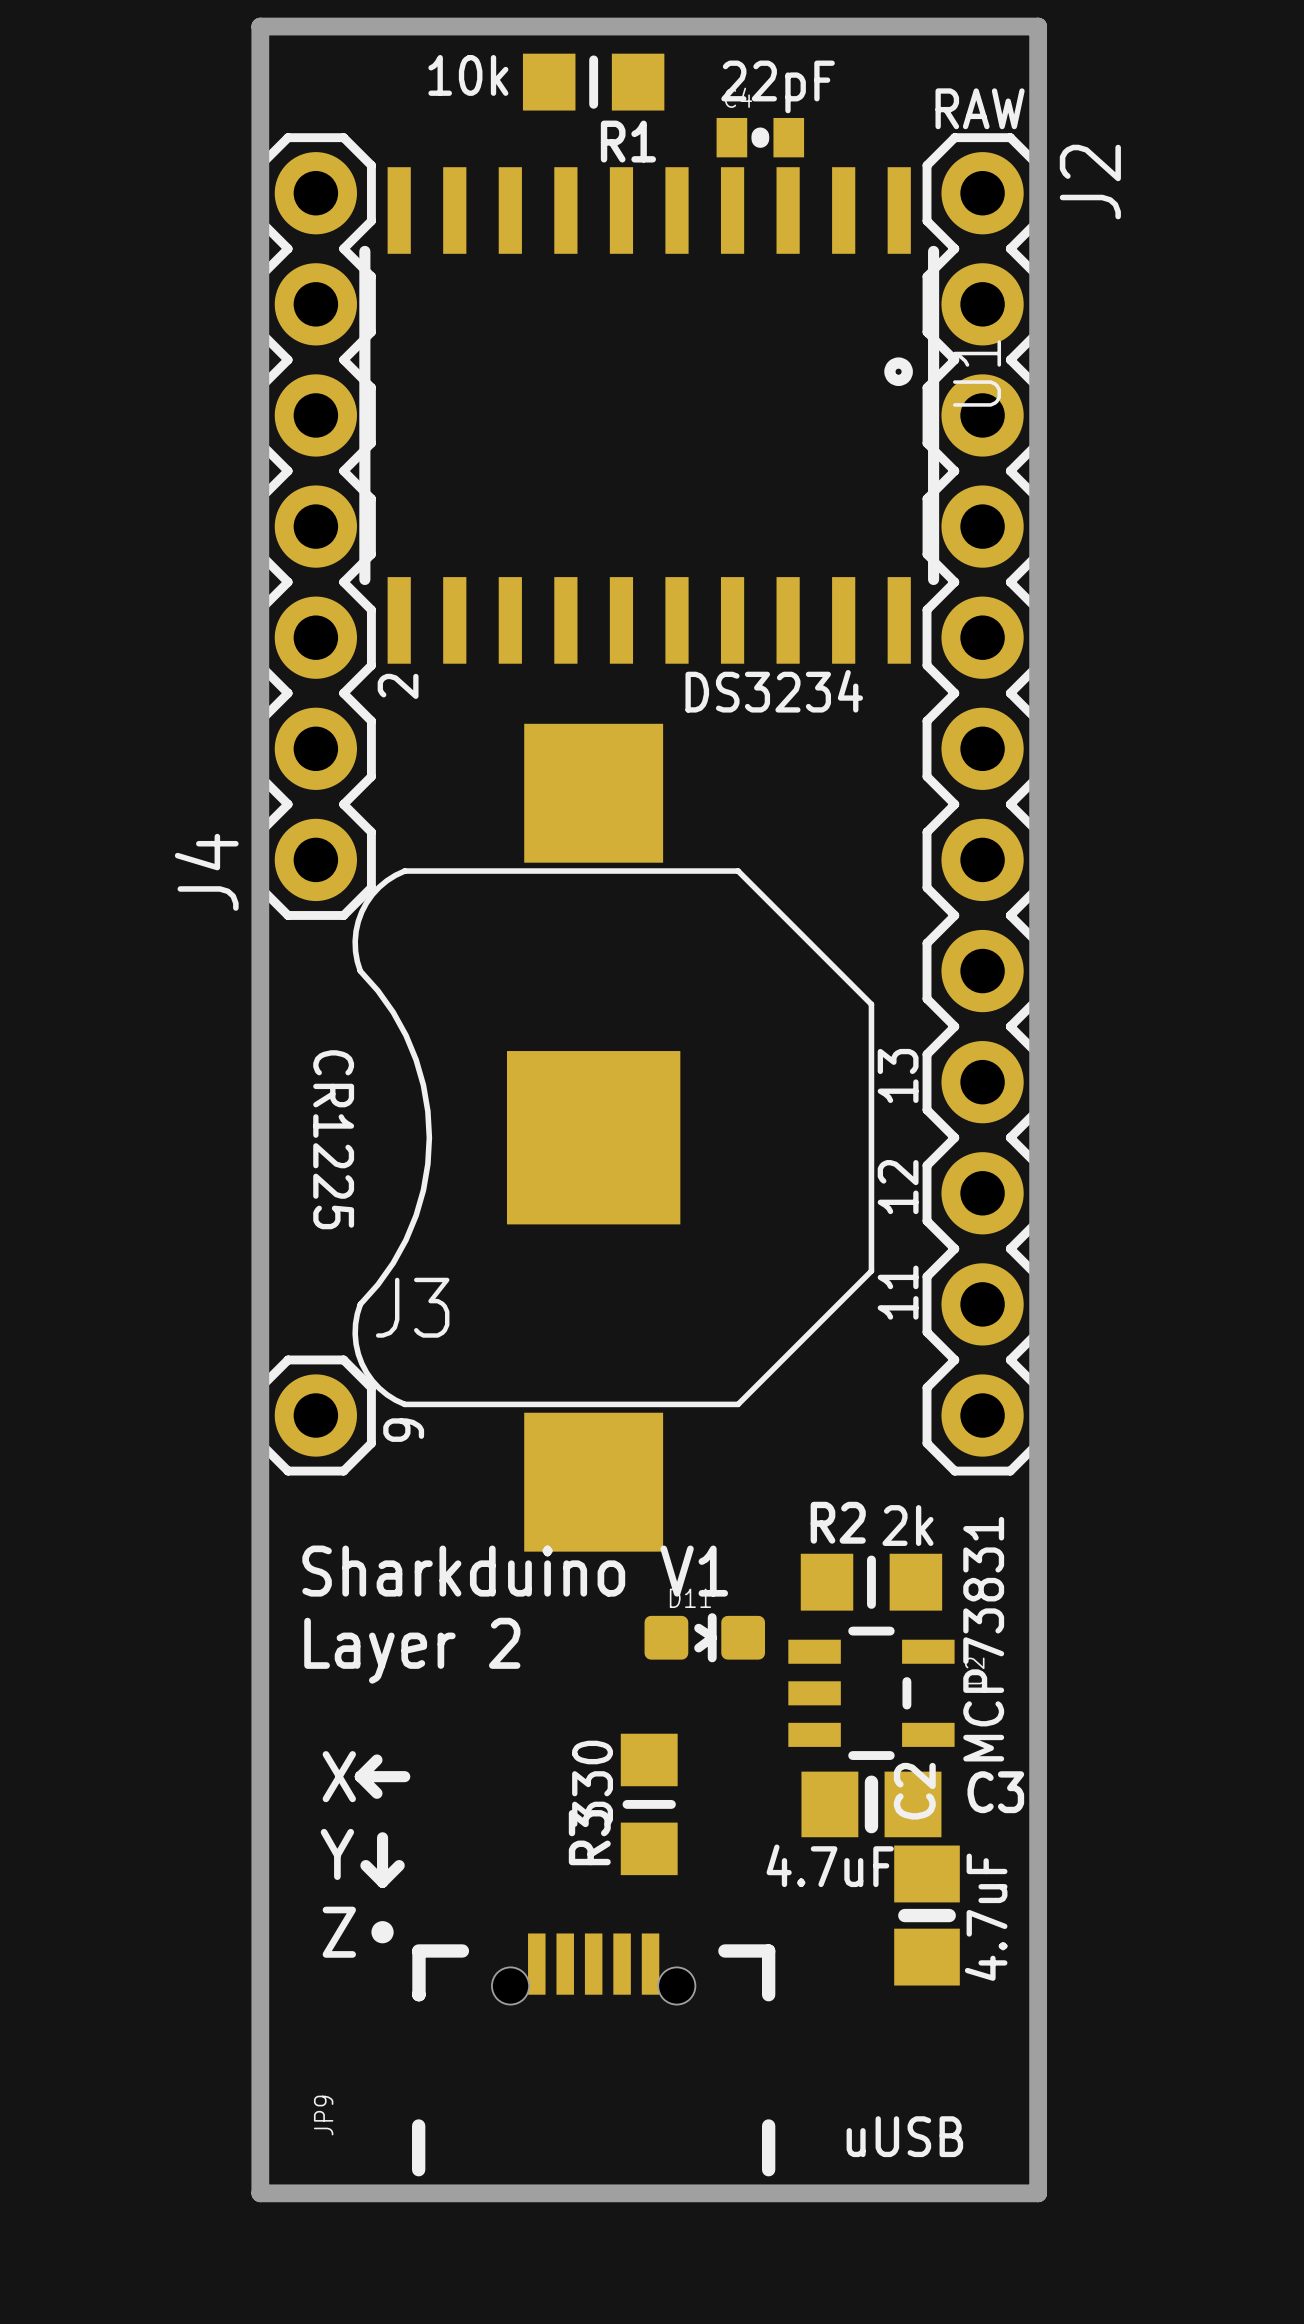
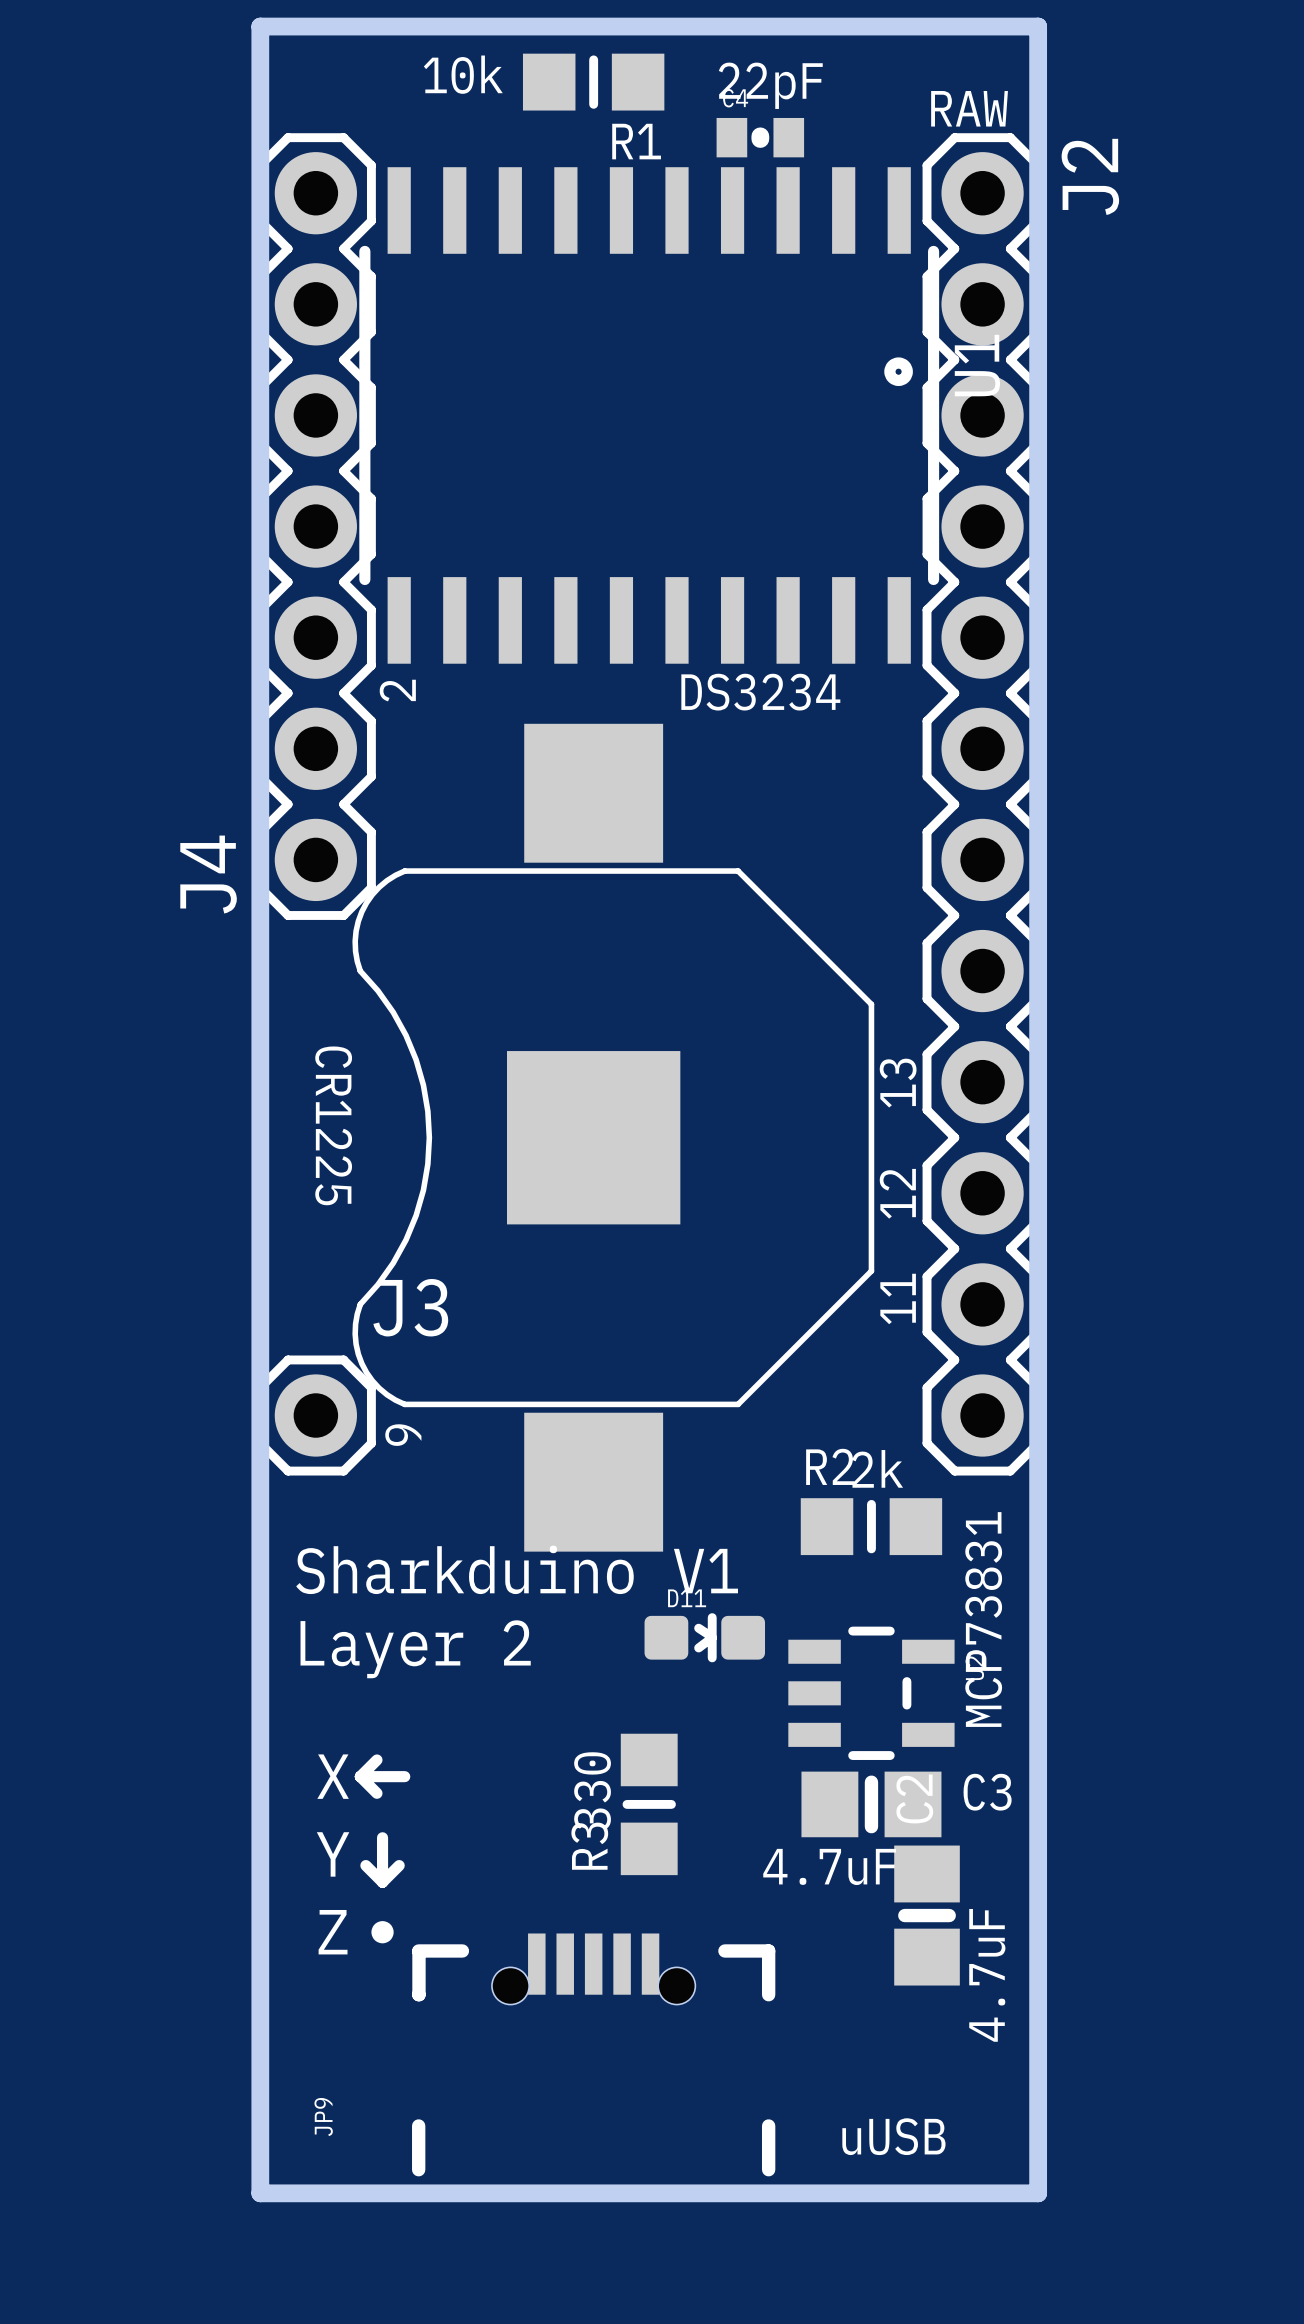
text position: 2k (907, 1525) -> 2k (877, 1468)
R2 position: (871, 1582) -> (871, 1526)
text position: 4.7uF (986, 1917) -> 4.7uF (987, 1975)

